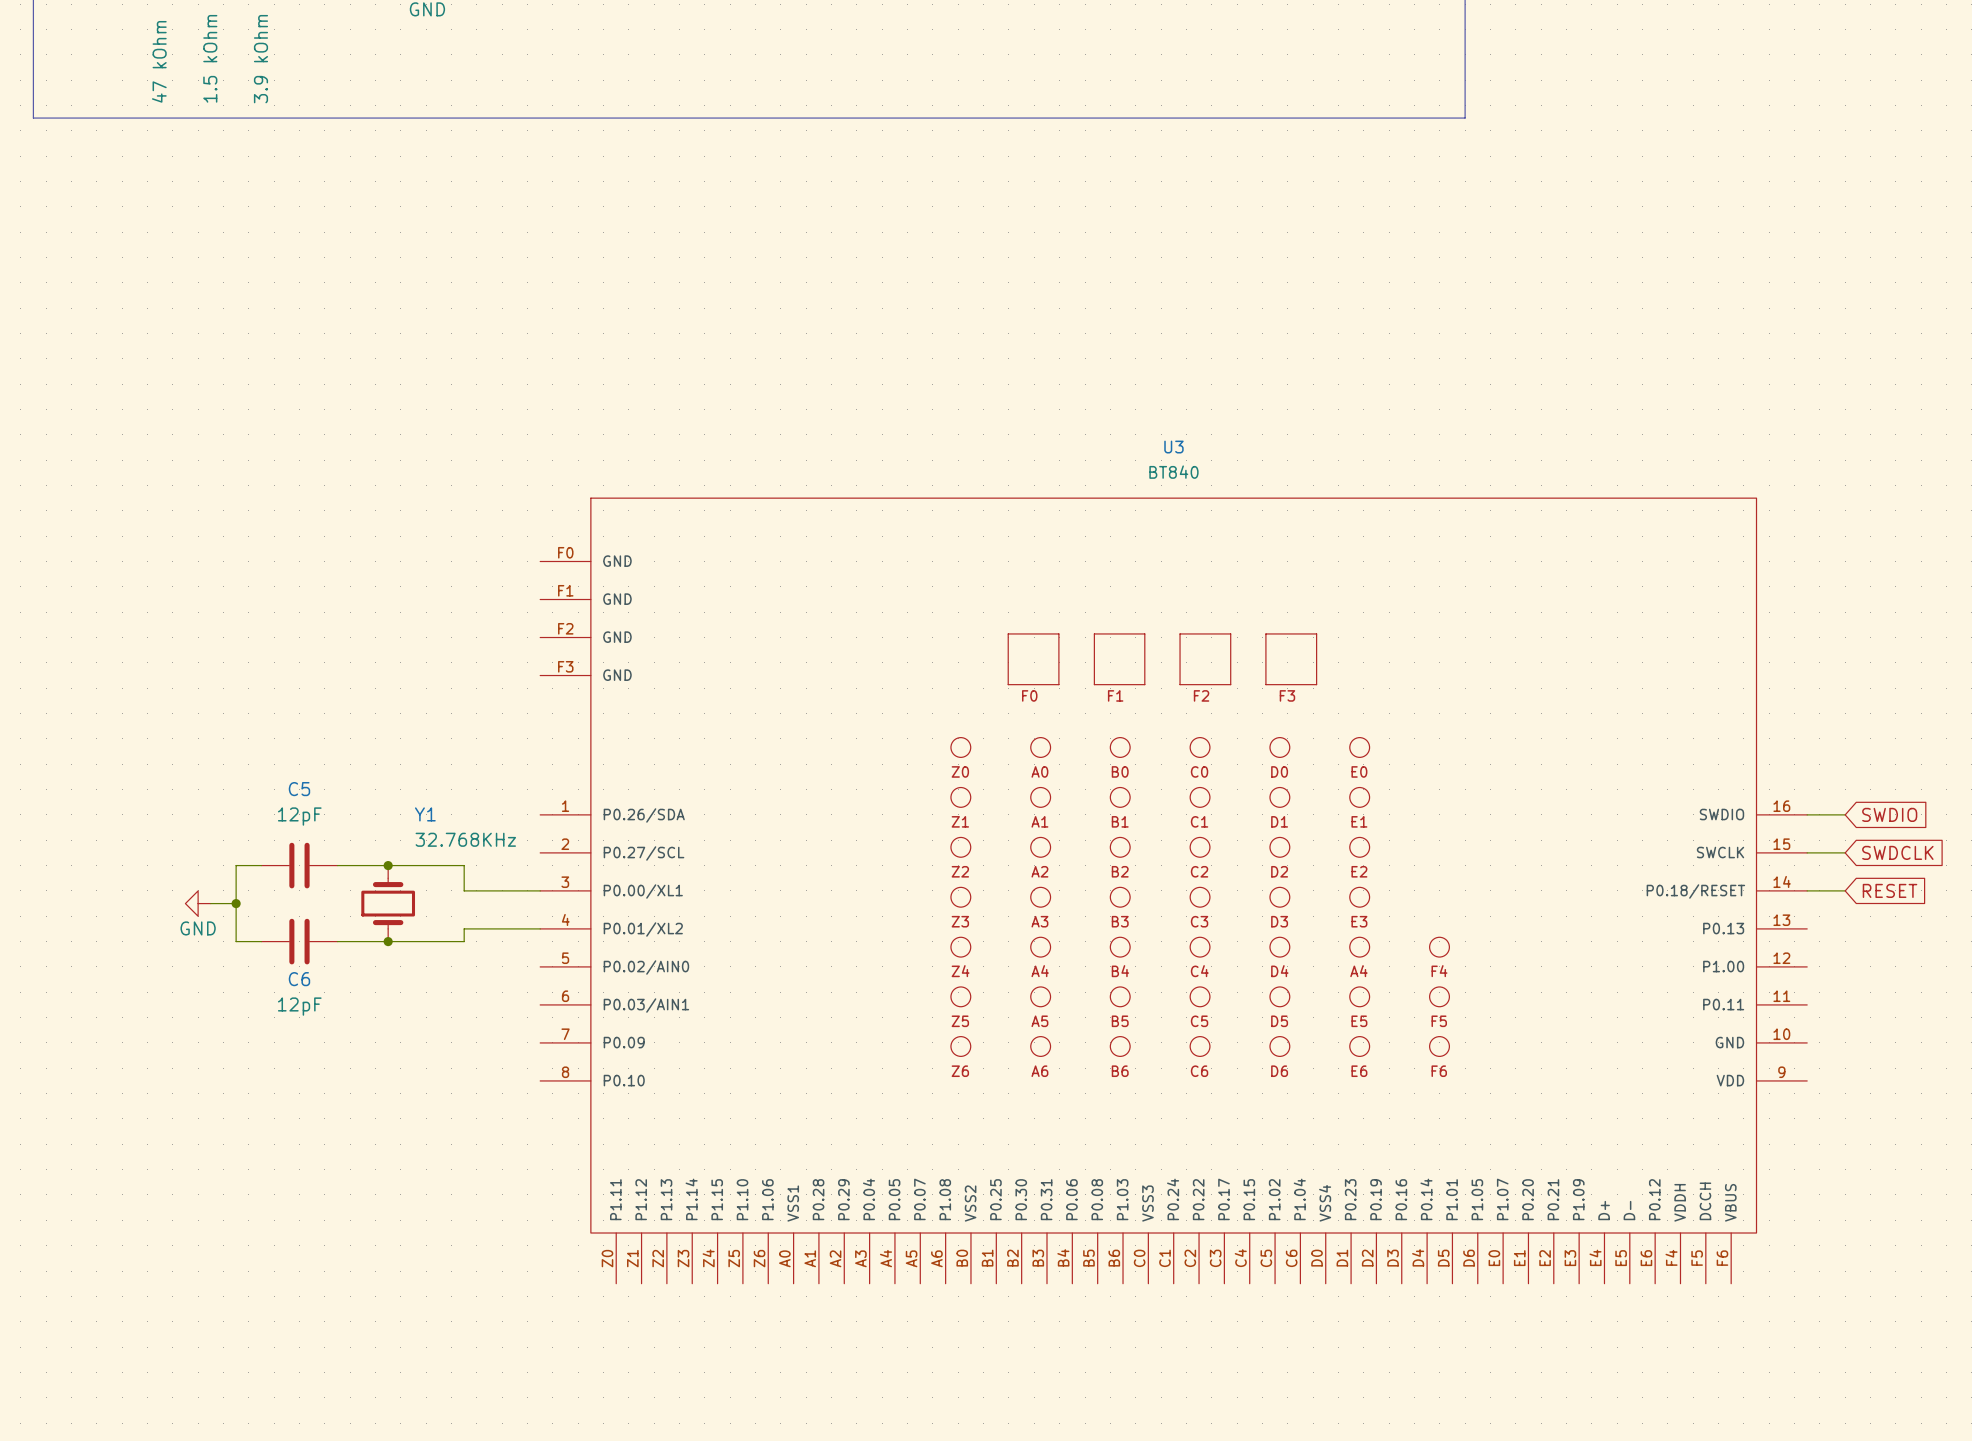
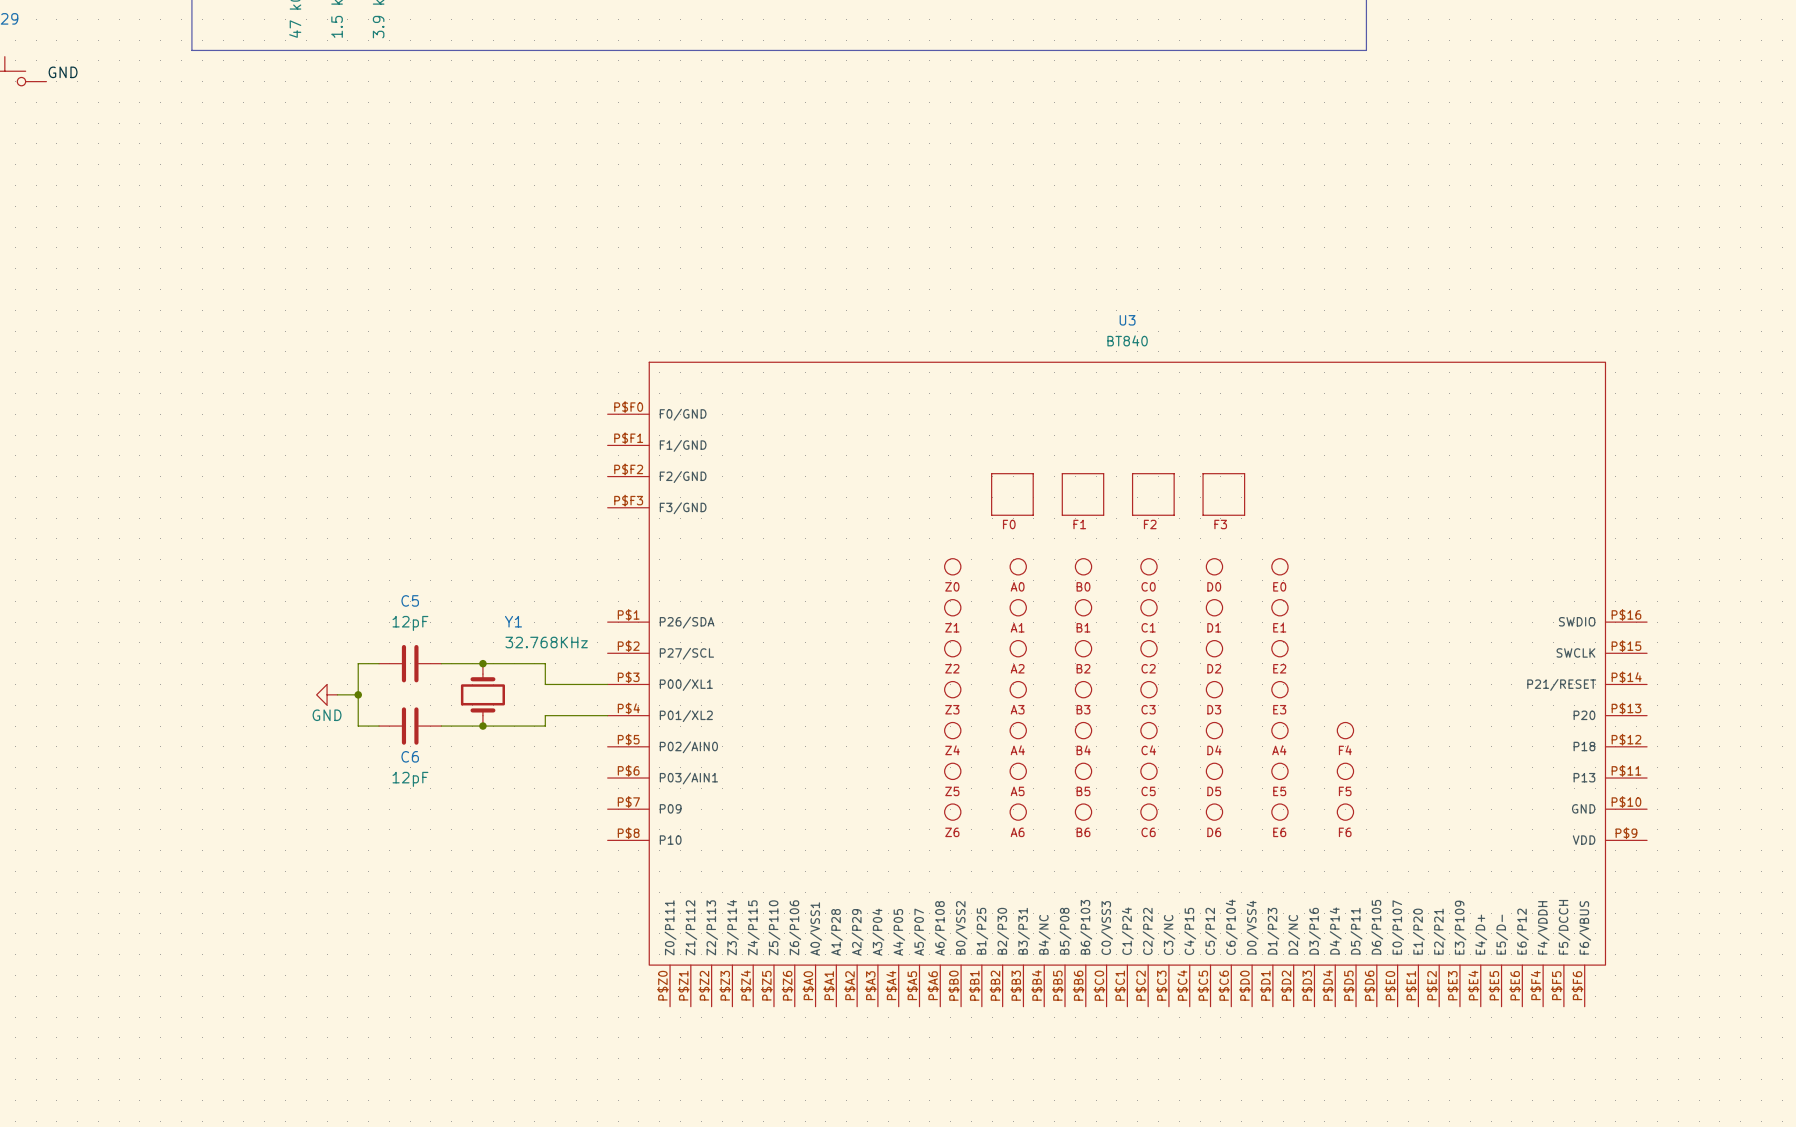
U3 symbol: [540, 498, 1808, 1284] -> [607, 362, 1648, 1007]
wire: (1807, 814) (1845, 814) -> none
global label: SWDIO (1889, 814) -> none
wire: (1807, 852) (1845, 852) -> none
global label: SWDCLK (1897, 852) -> none
wire: (1807, 890) (1845, 890) -> none
global label: RESET (1890, 890) -> none

